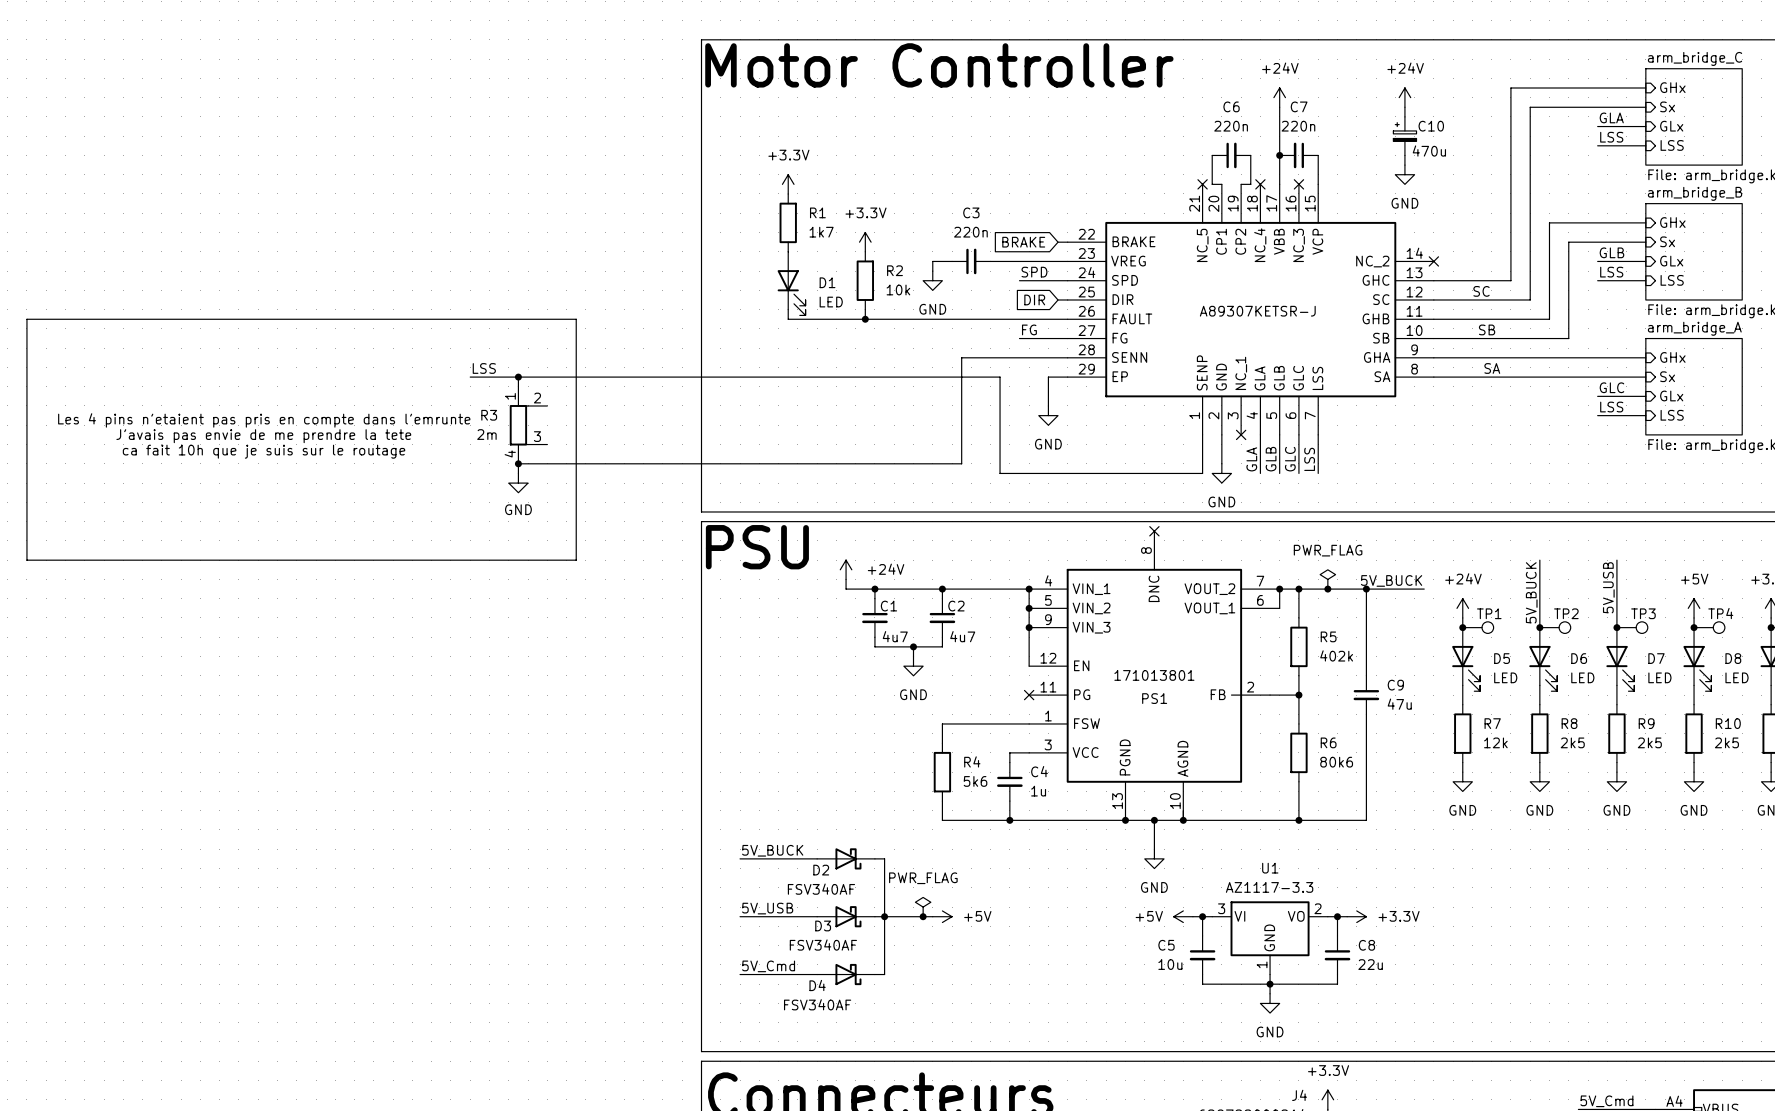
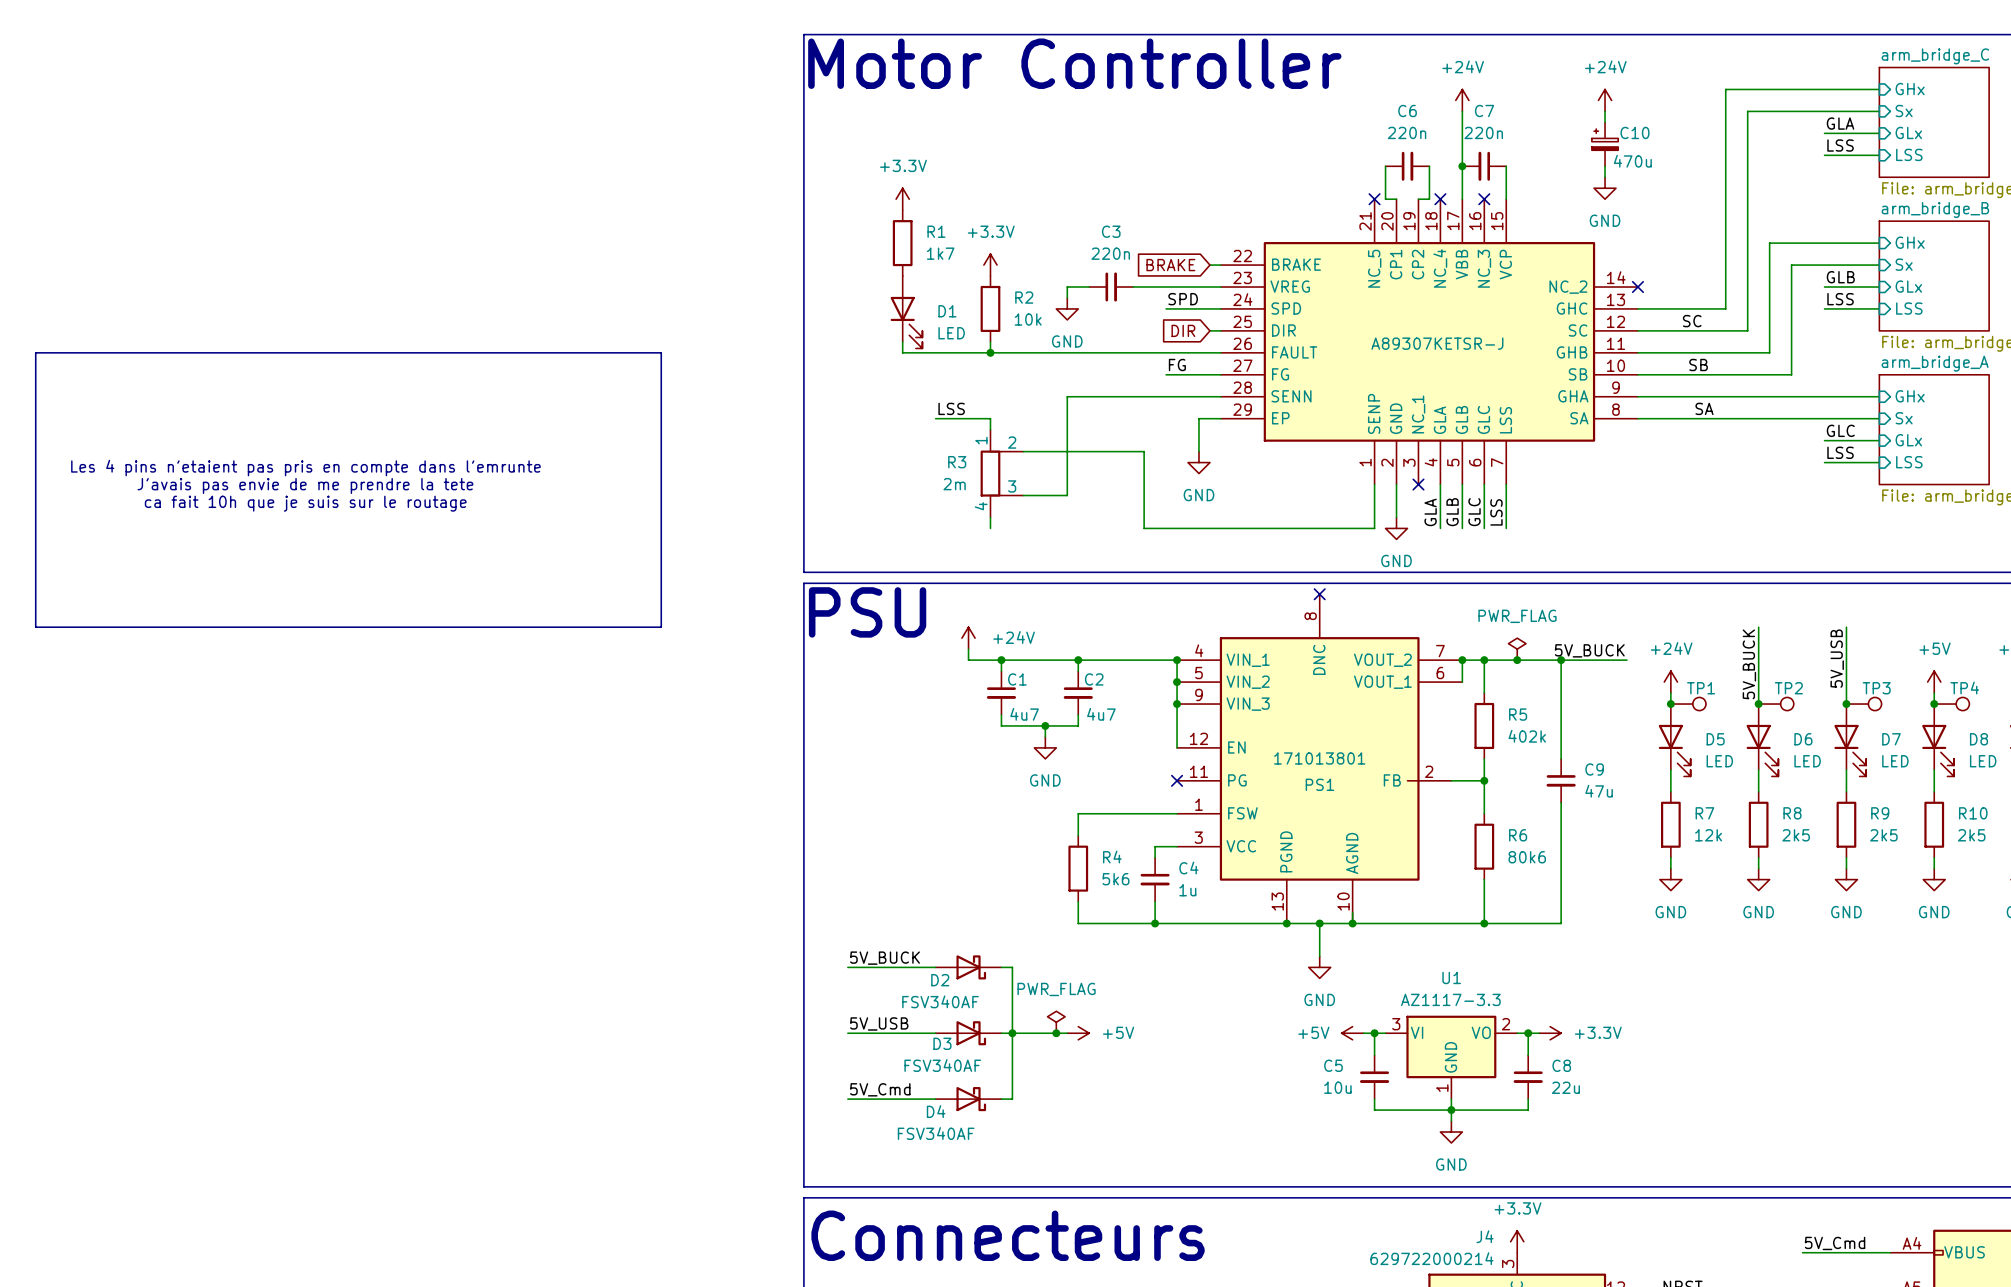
wire: (961, 357) (961, 463) (518, 463) (518, 473) -> (1100, 396) (1067, 396) (1067, 495) (1023, 495)
label: LSS (484, 368) -> none
label: none -> LSS (951, 408)
wire: (470, 377) (817, 377) -> none
wire: (518, 377) (518, 386) -> none
junction: (518, 377) -> none
wire: (865, 377) (1000, 377) (1000, 473) -> (1023, 451) (1144, 451) (1144, 528)
wire: none -> (990, 418) (990, 429)
R3 position: (528, 425) -> (1002, 473)
junction: (518, 463) -> none
wire: none -> (990, 517) (990, 528)
power symbol: GND (518, 483) -> none

